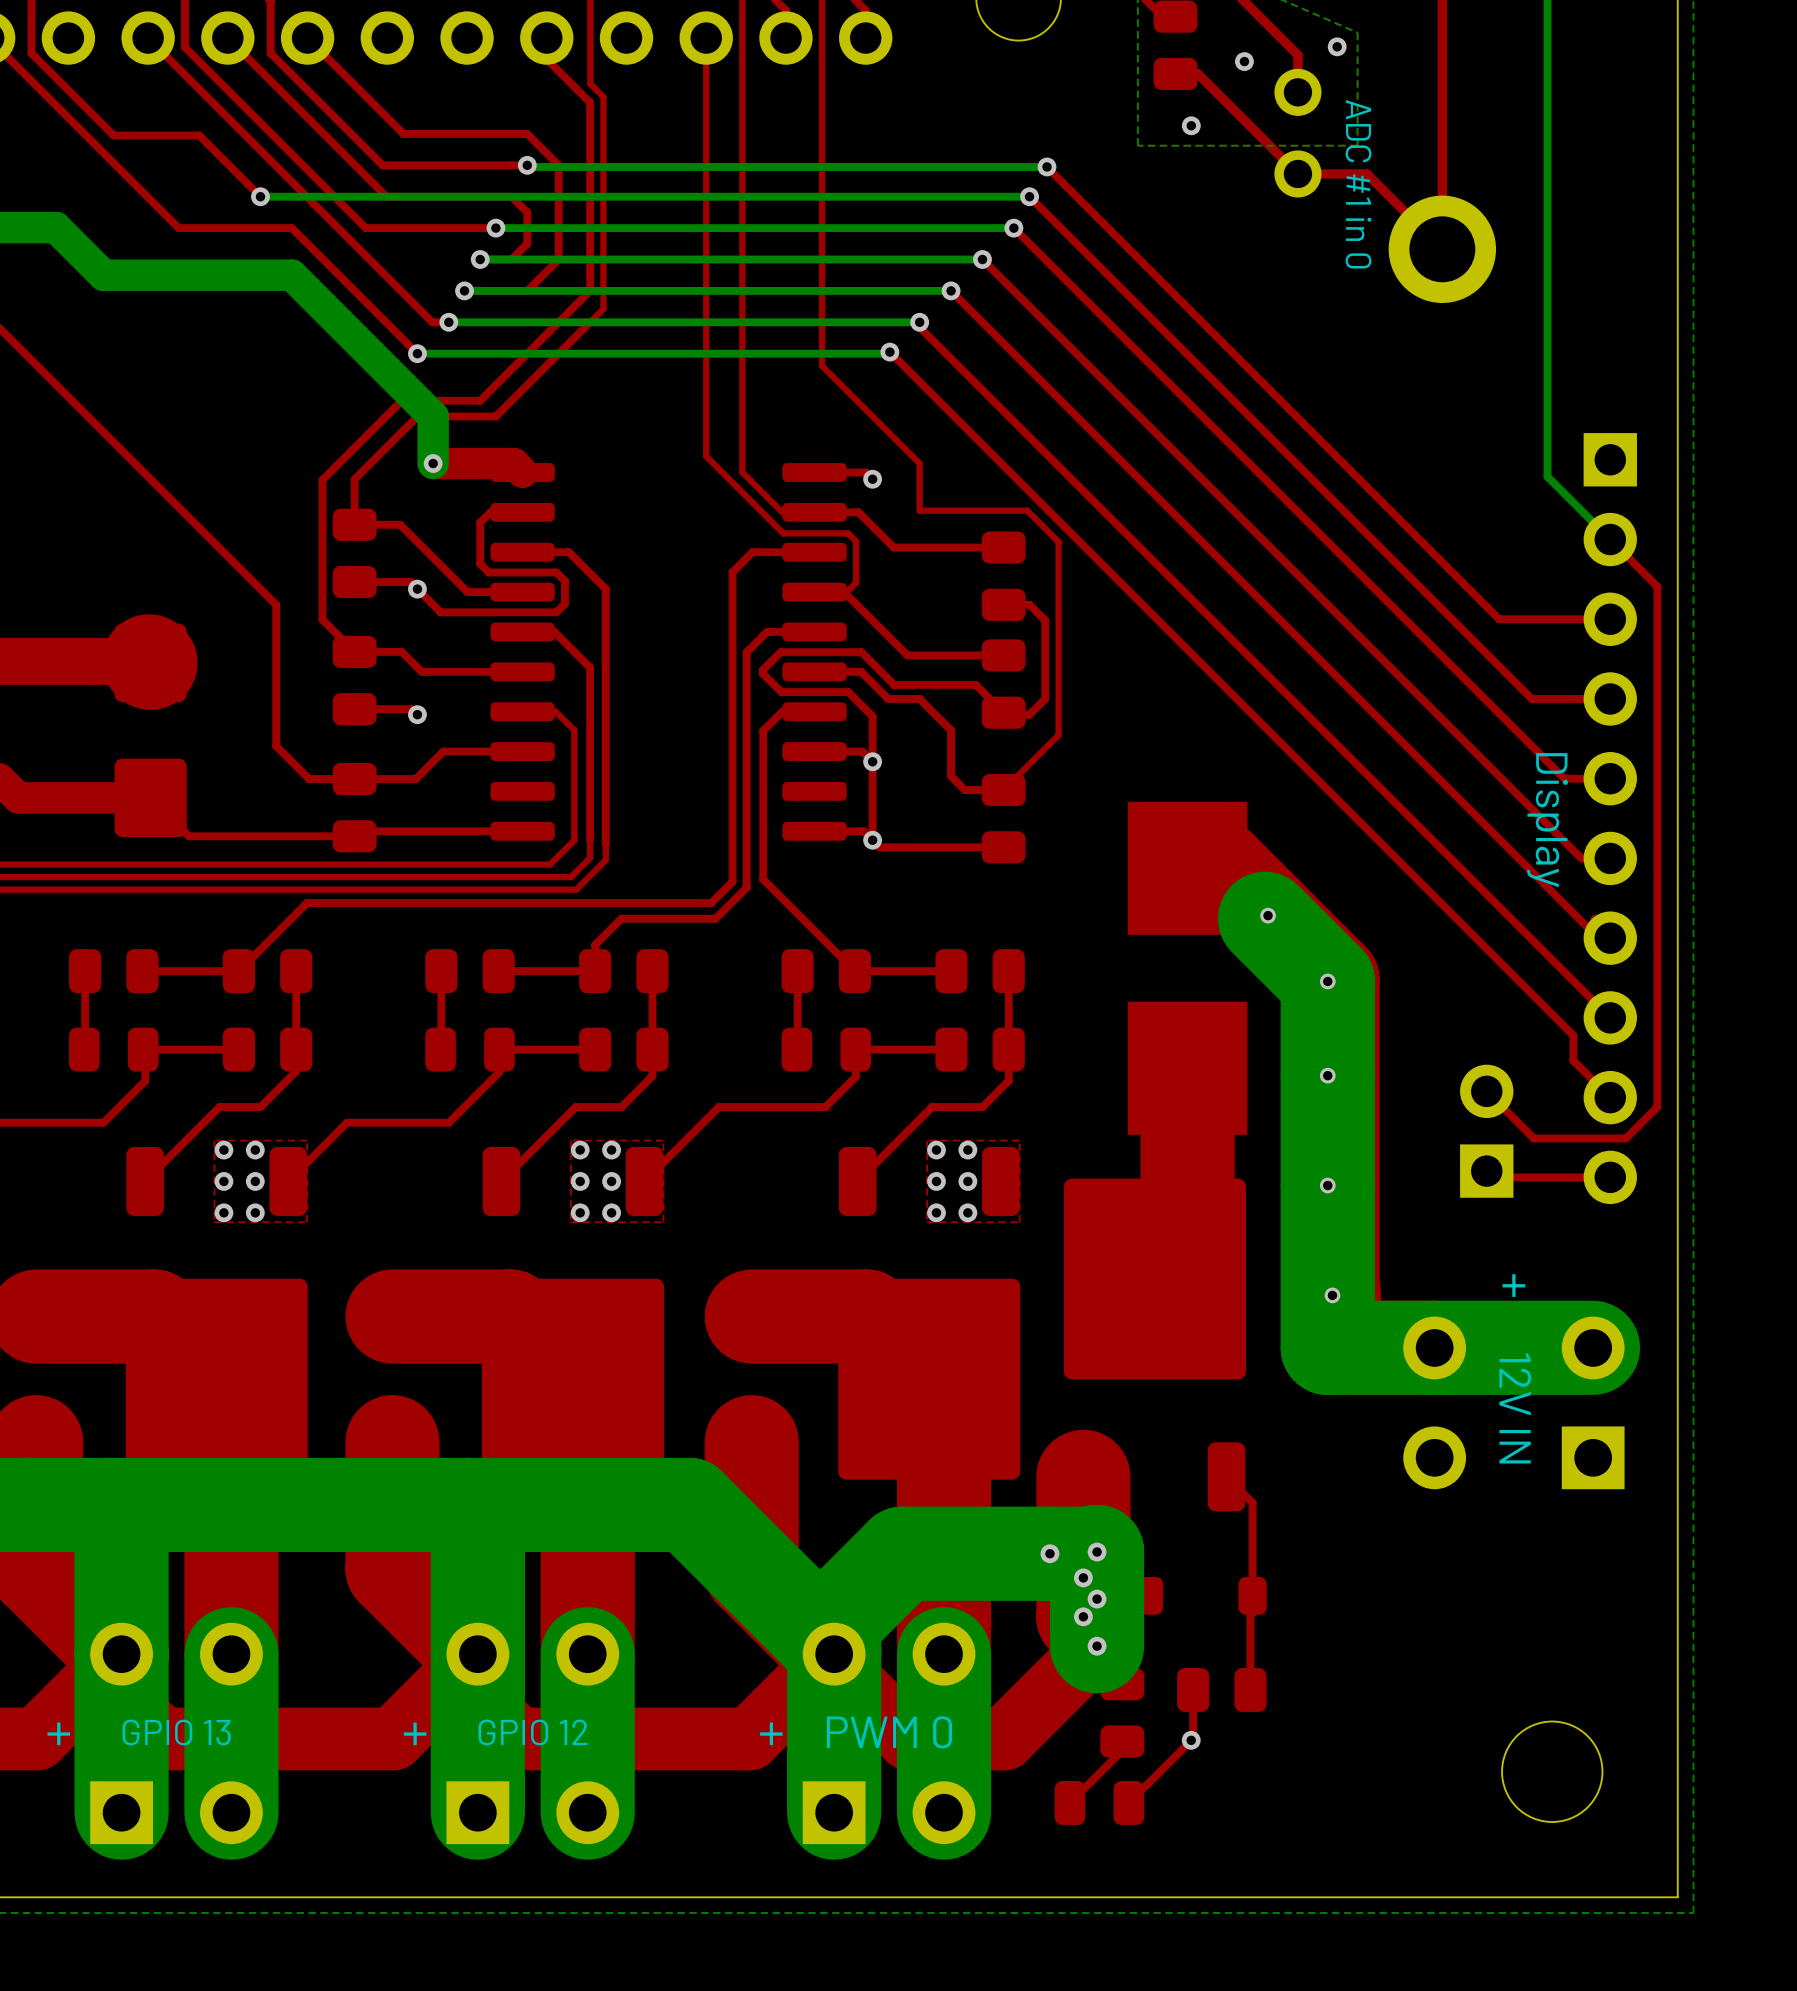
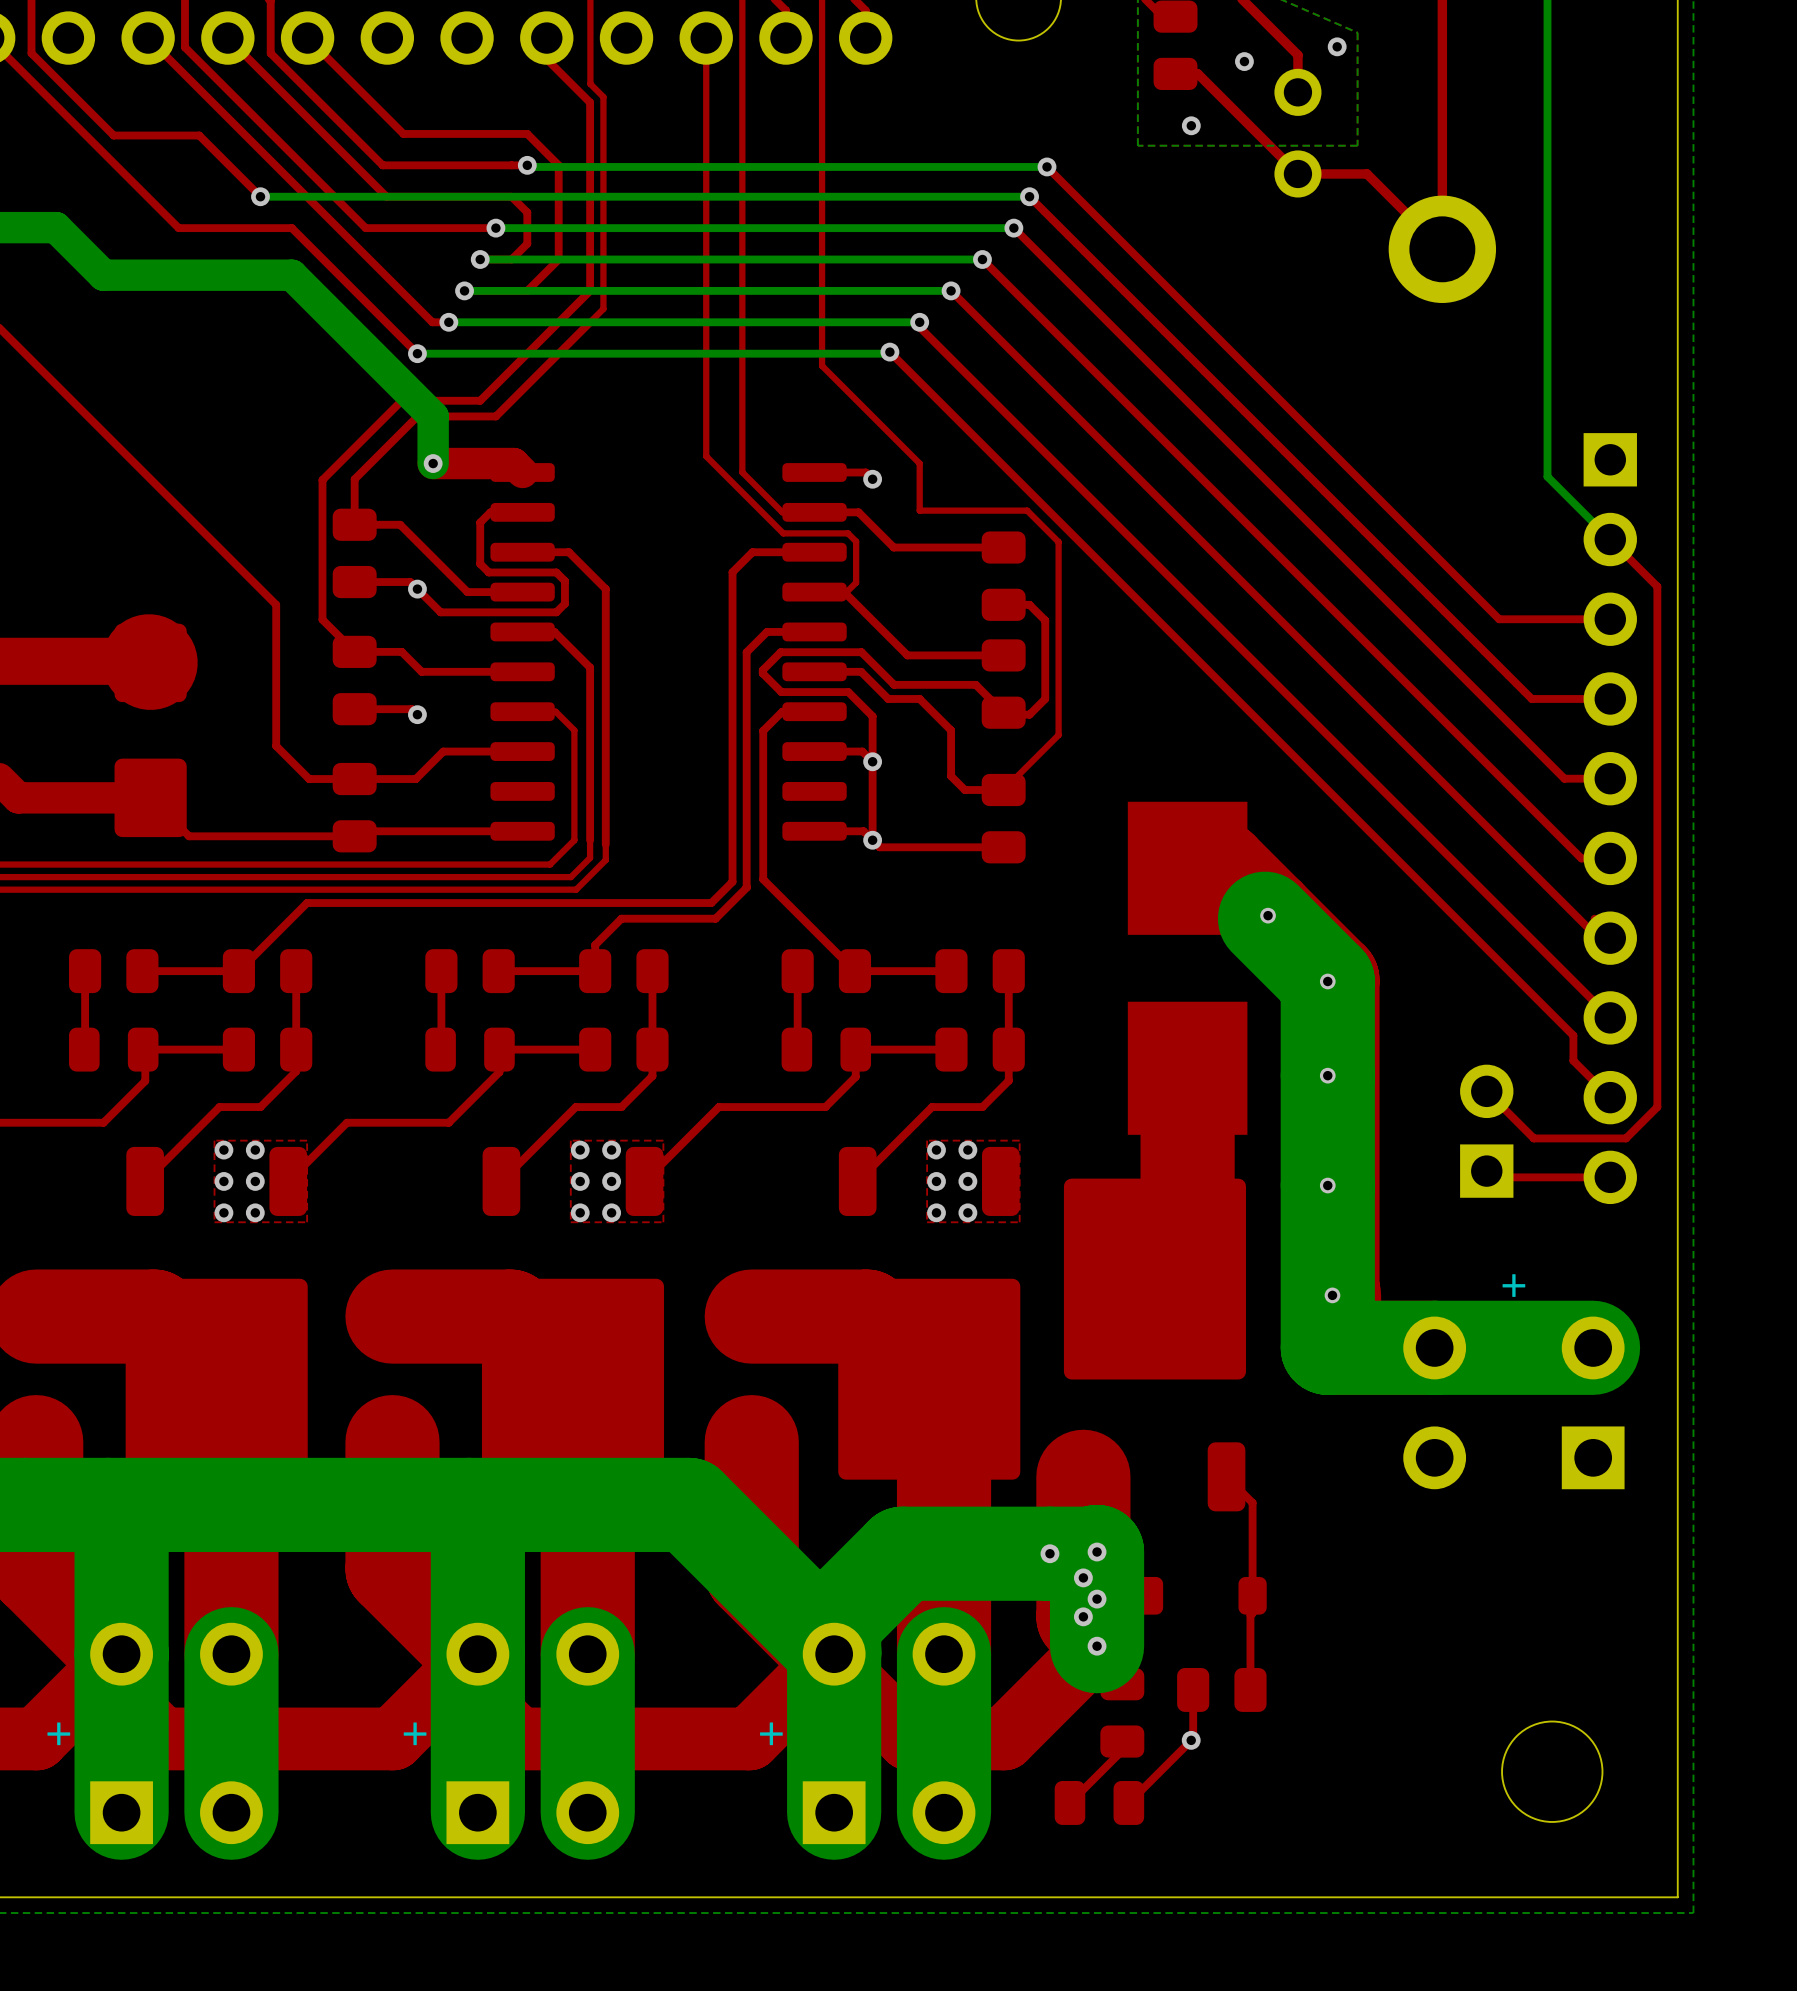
text: ADC #1 in 0 (1358, 184) -> none
text: Display (1547, 820) -> none
text: 12V IN (1515, 1408) -> none
text: GPIO 13 (176, 1732) -> none
text: GPIO 12 (533, 1732) -> none
text: PWM 0 (889, 1732) -> none

